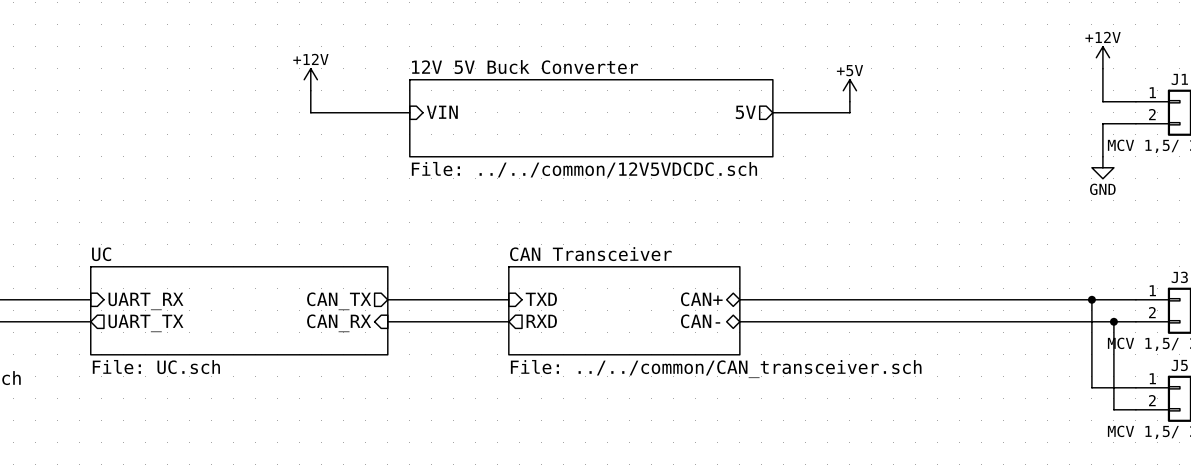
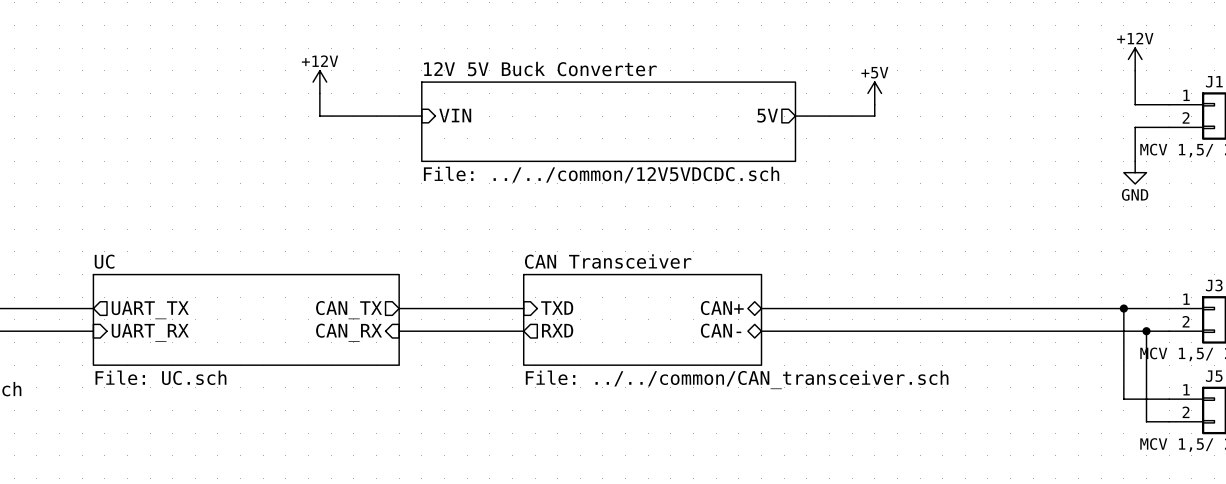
sheet pin shape: input (145, 301) -> output (150, 310)
sheet pin: UART_RX (145, 301) -> UART_TX (150, 310)
sheet pin shape: output (145, 323) -> input (150, 332)
sheet pin: UART_TX (145, 323) -> UART_RX (150, 332)

